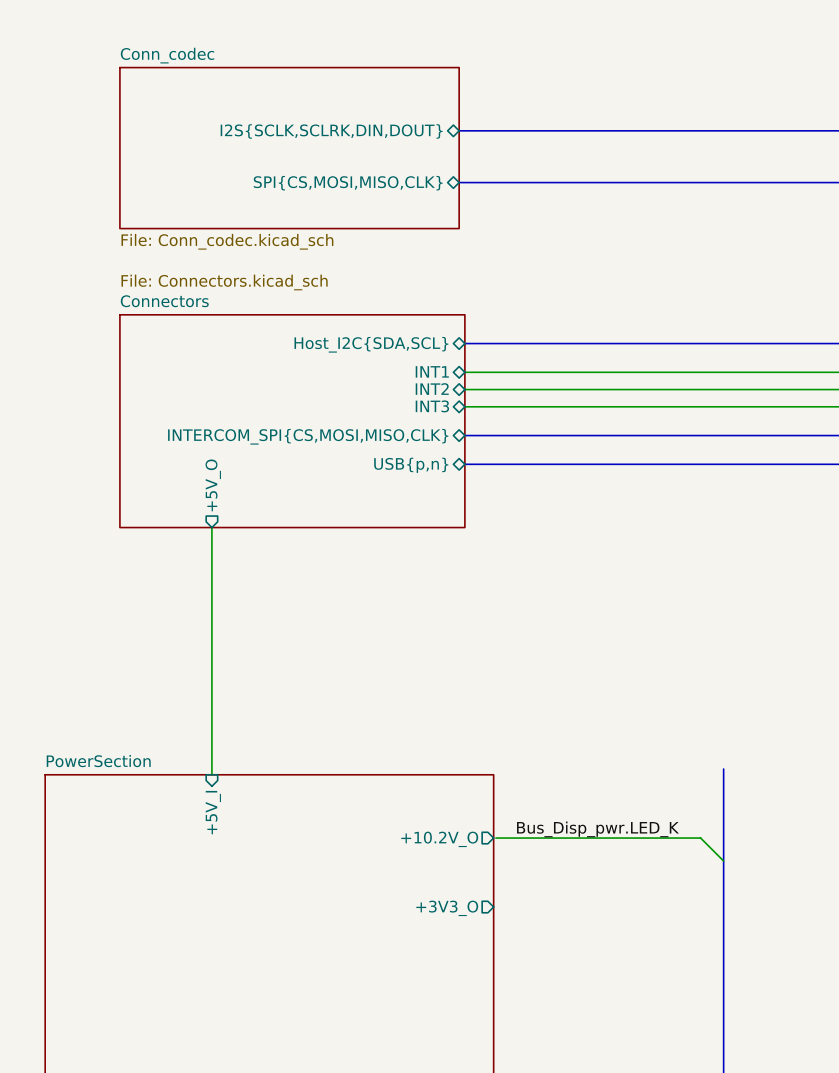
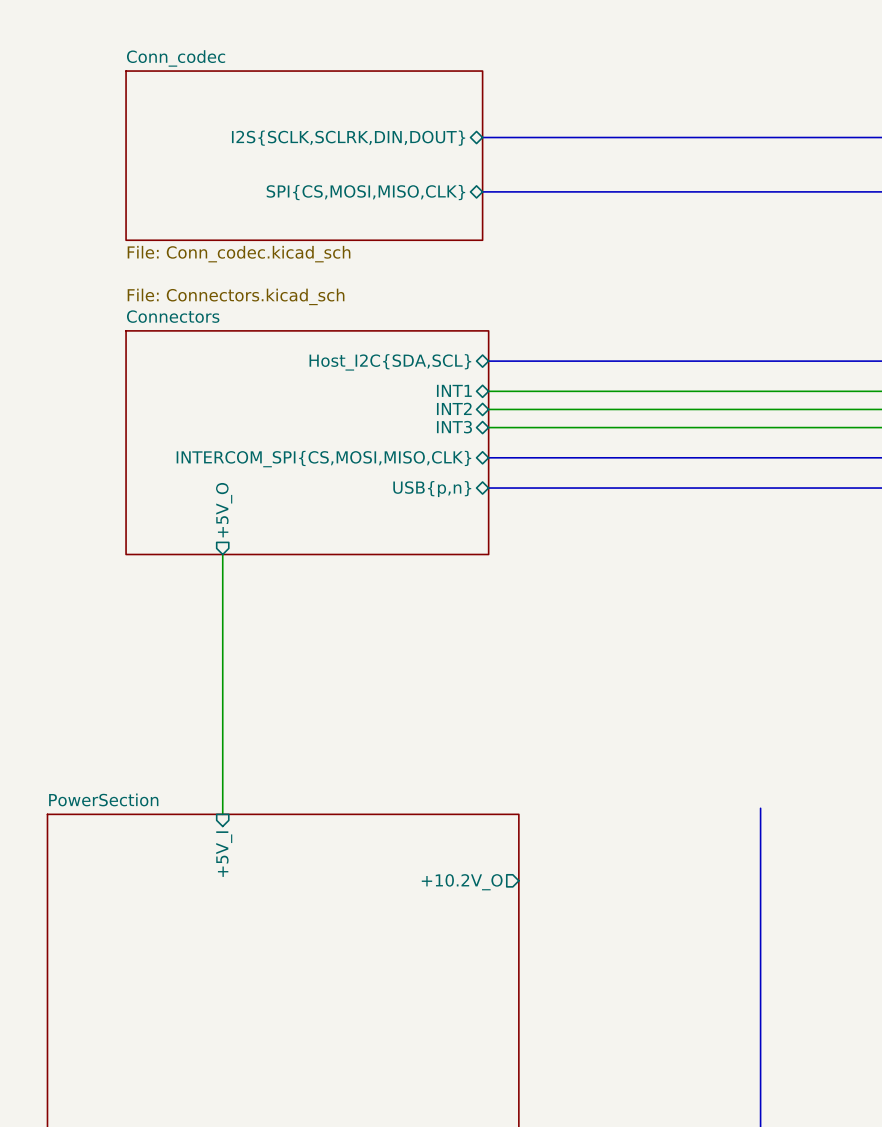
label: Bus_Disp_pwr.LED_K (597, 829) -> none
wire: (495, 838) (700, 838) (723, 861) -> none
sheet pin: +3V3_O (447, 908) -> none

